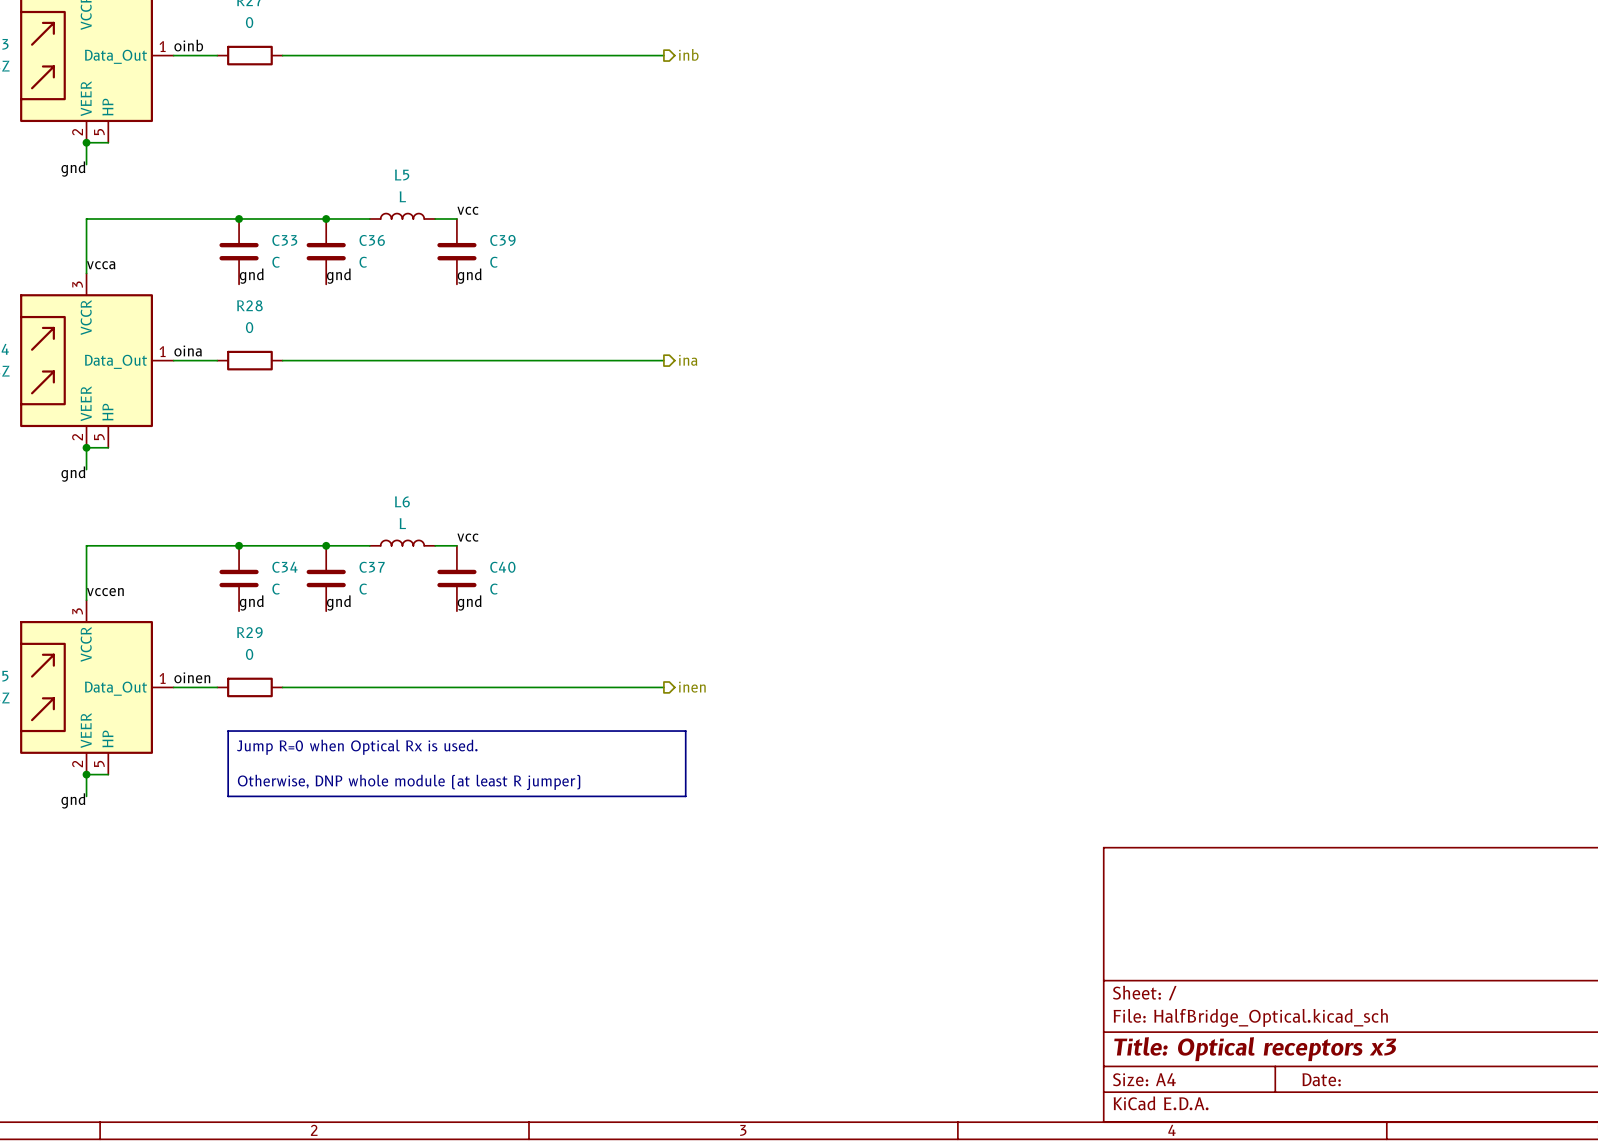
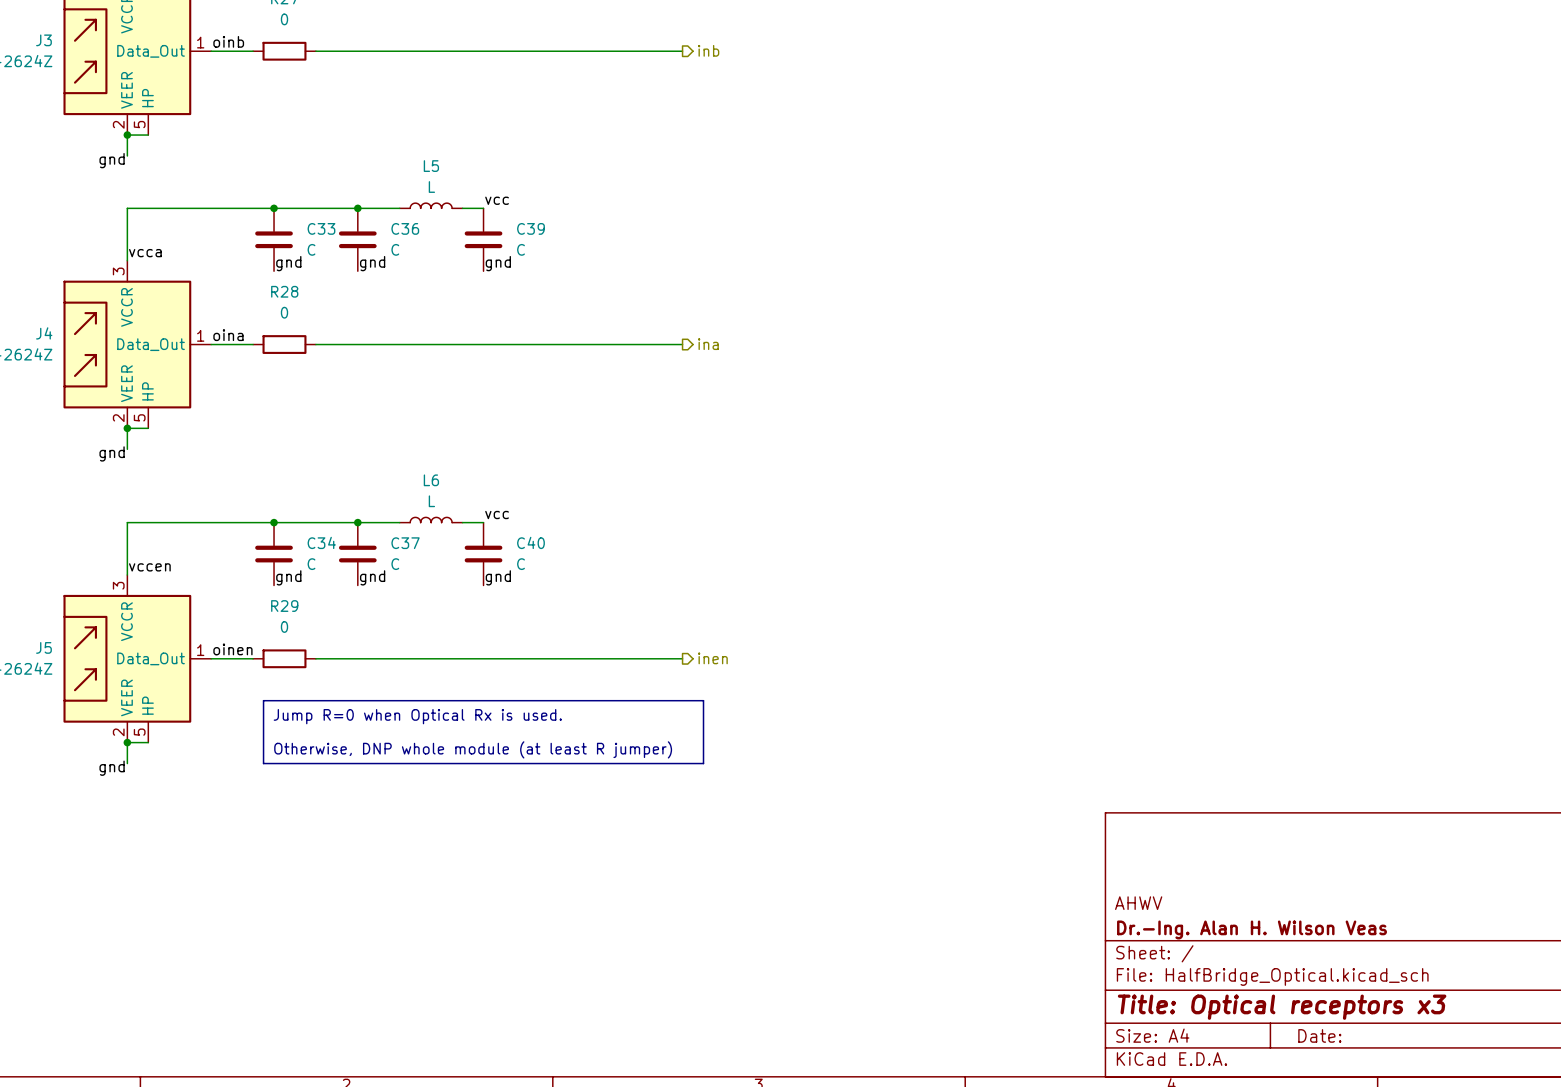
title block: none -> AHWV (1138, 903)
title block: none -> Dr.-Ing. Alan H. Wilson Veas (1252, 929)

